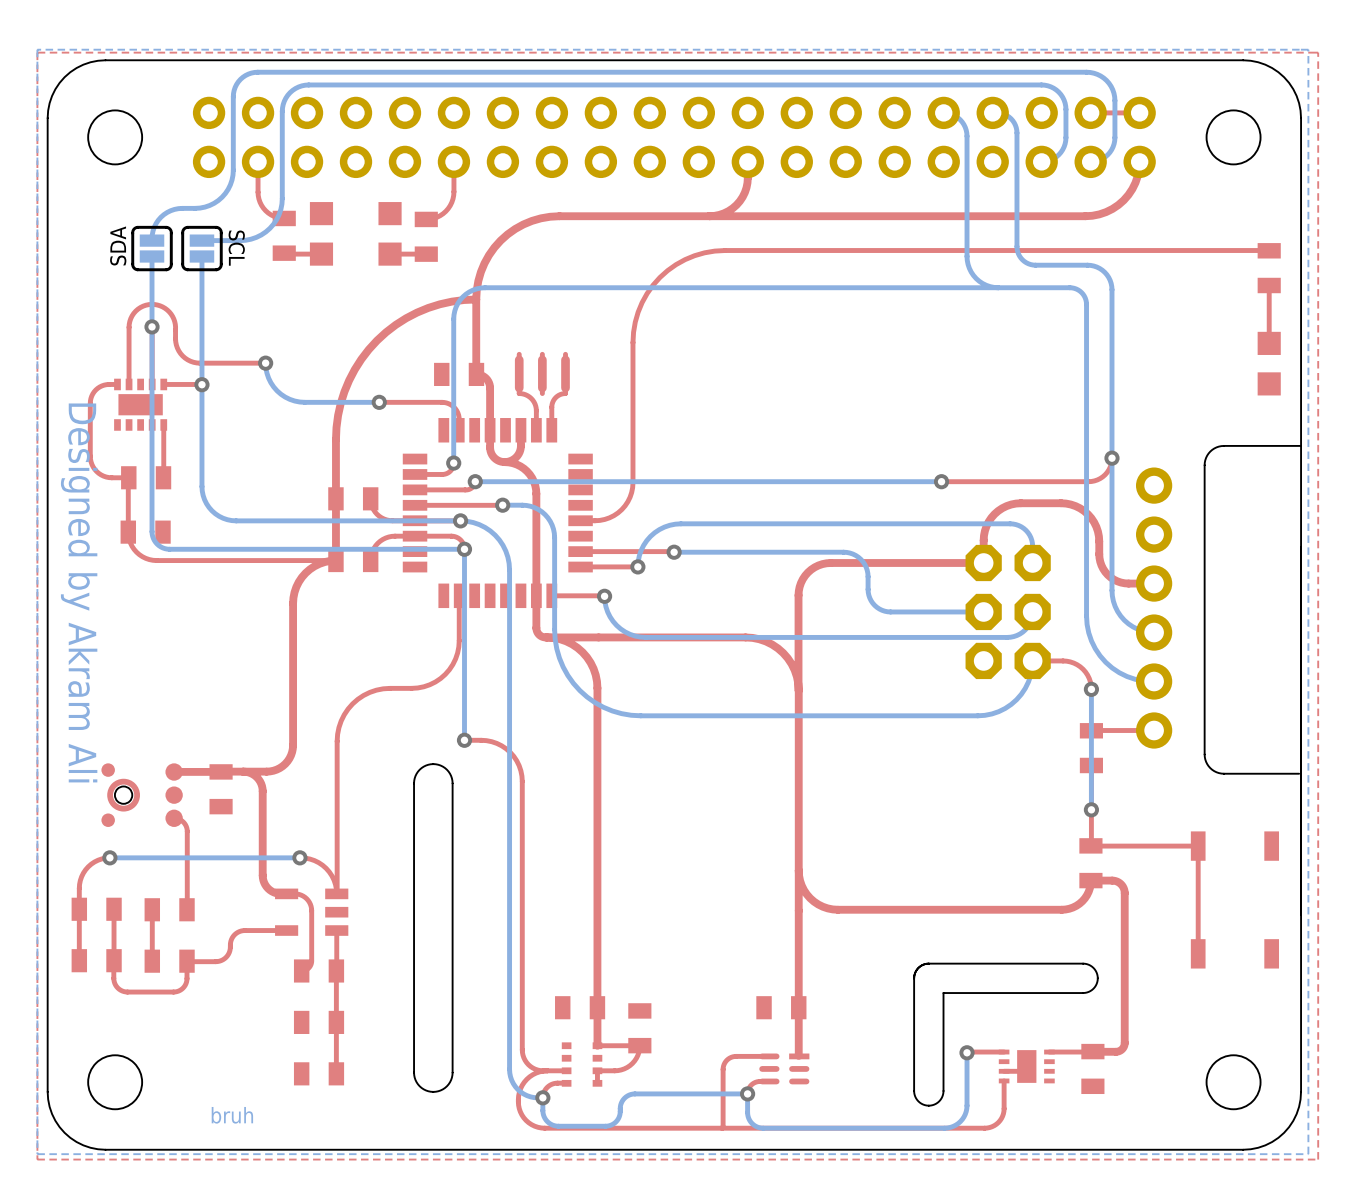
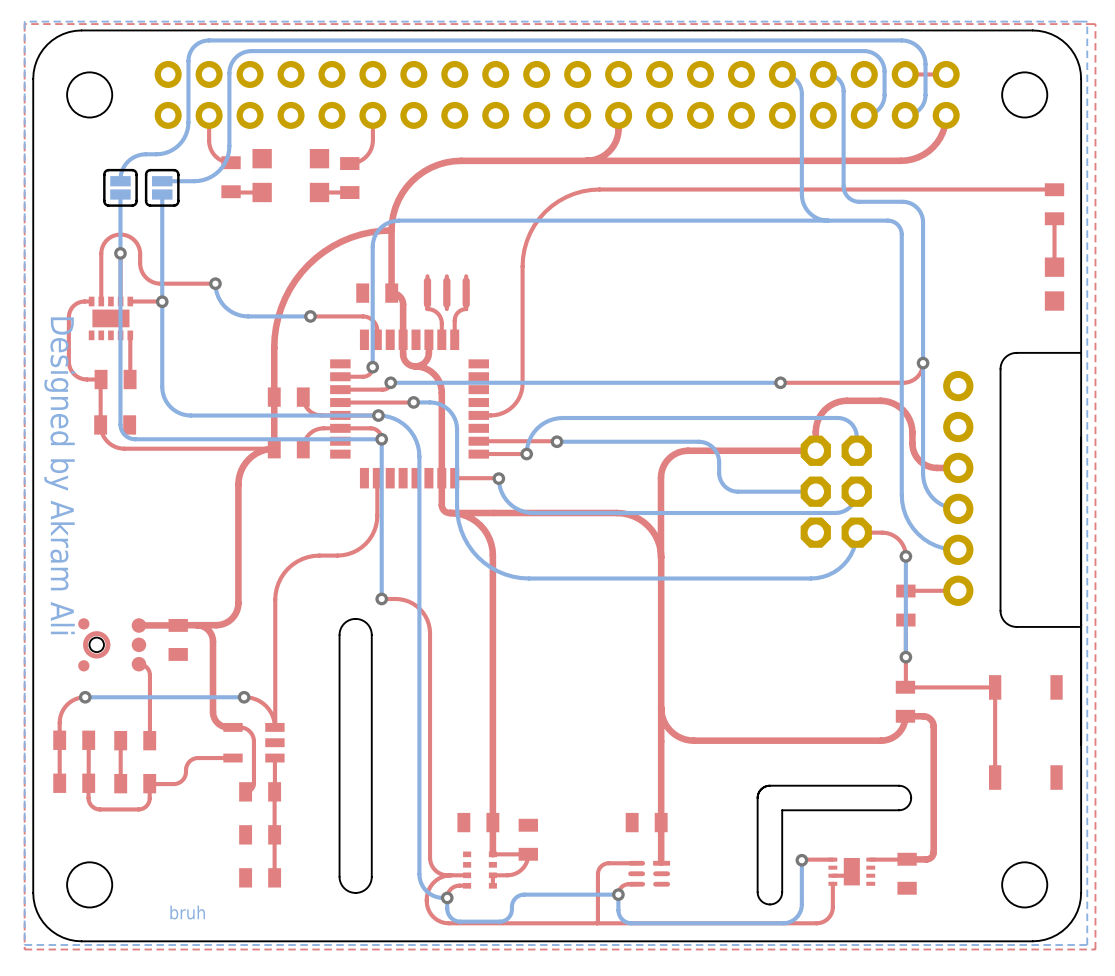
part value: SDA (118, 245) -> none
part value: SCL (236, 248) -> none

